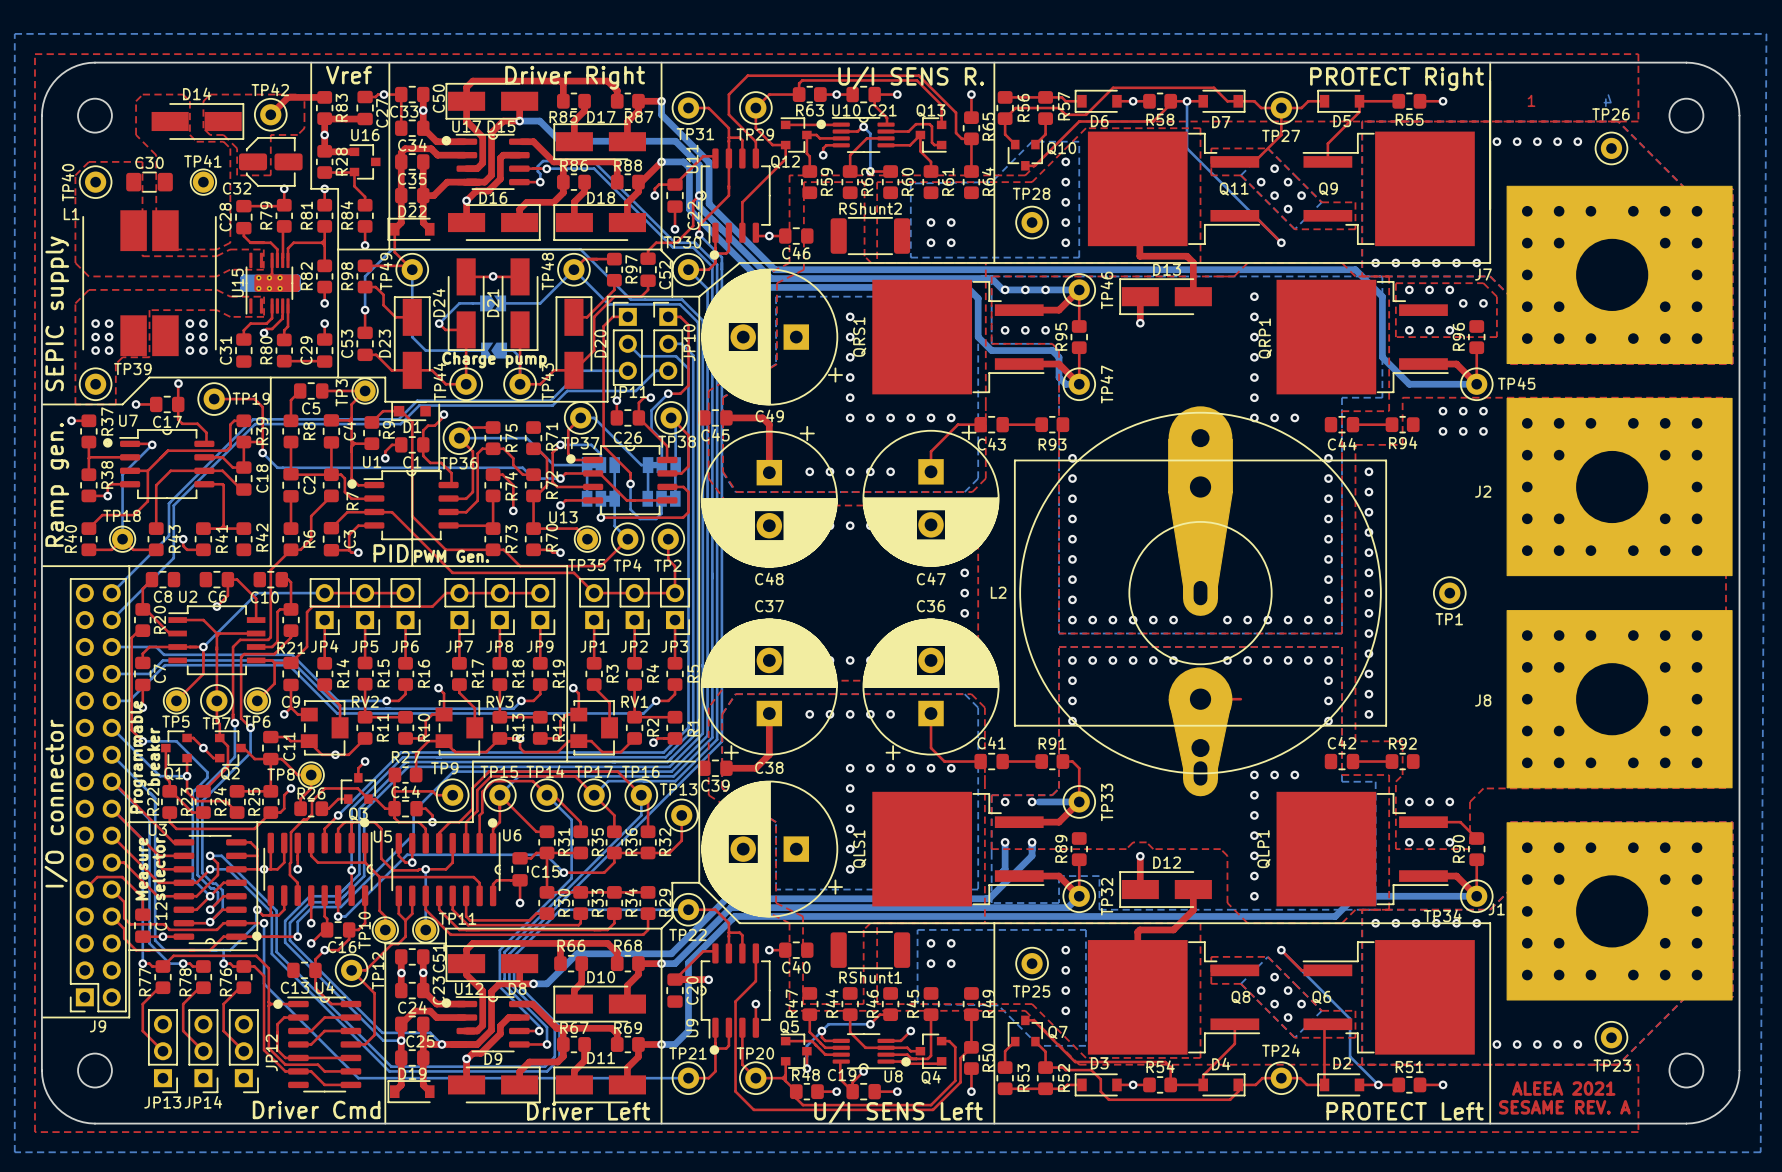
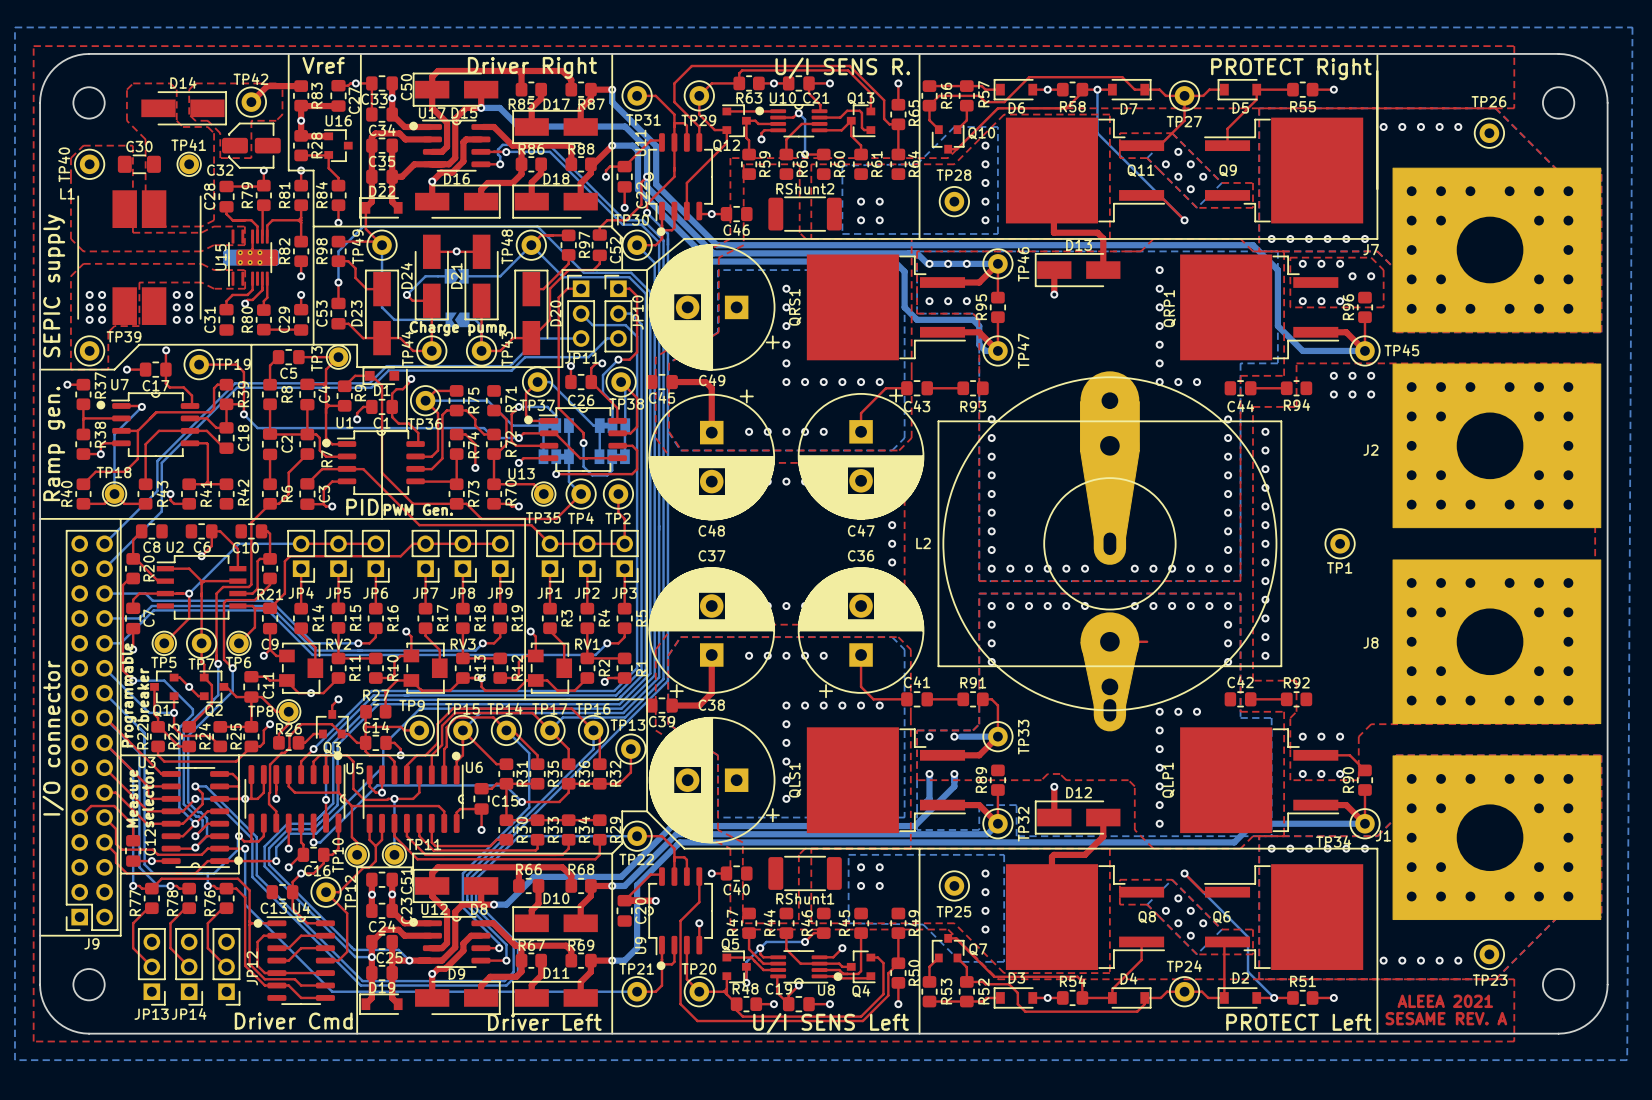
drawing: [1527, 94, 1612, 107] -> none

